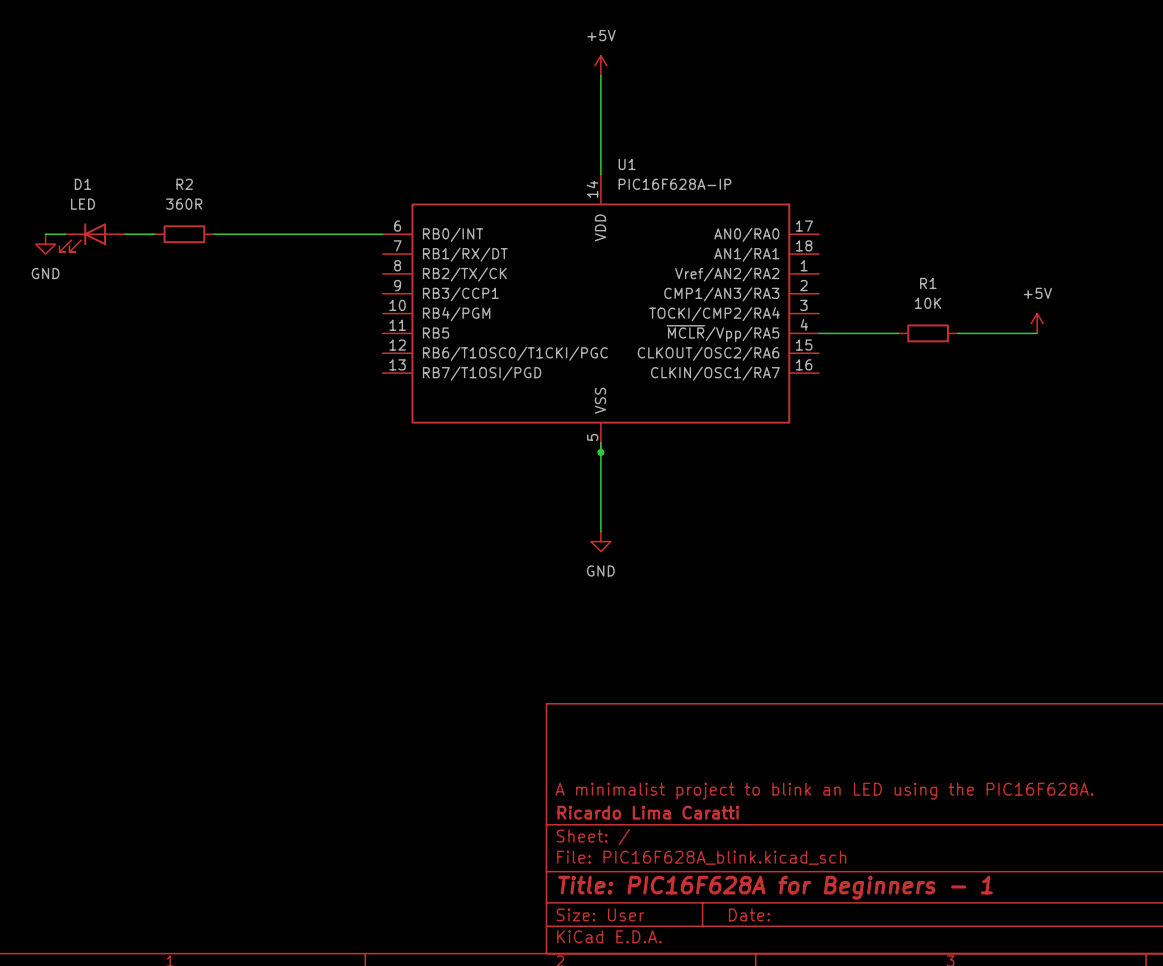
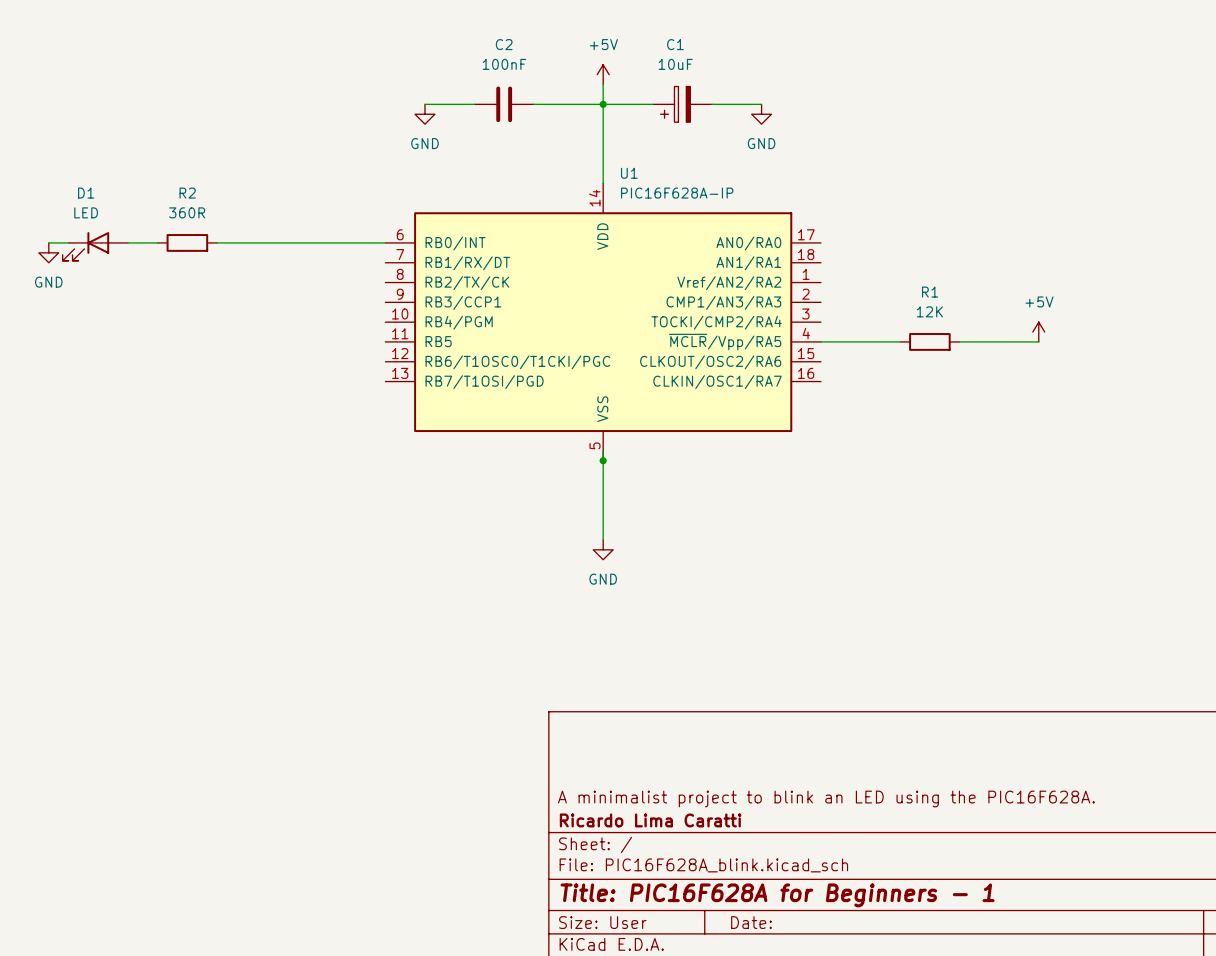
wire: none -> (424, 104) (474, 104)
C2: none -> 100nF (504, 104)
wire: none -> (533, 104) (652, 104)
junction: none -> (603, 104)
C1: none -> 10uF (682, 104)
wire: none -> (712, 104) (761, 104)
power symbol: none -> GND (424, 114)
power symbol: none -> GND (761, 114)
R1 value: 10K (928, 303) -> 12K (929, 311)

